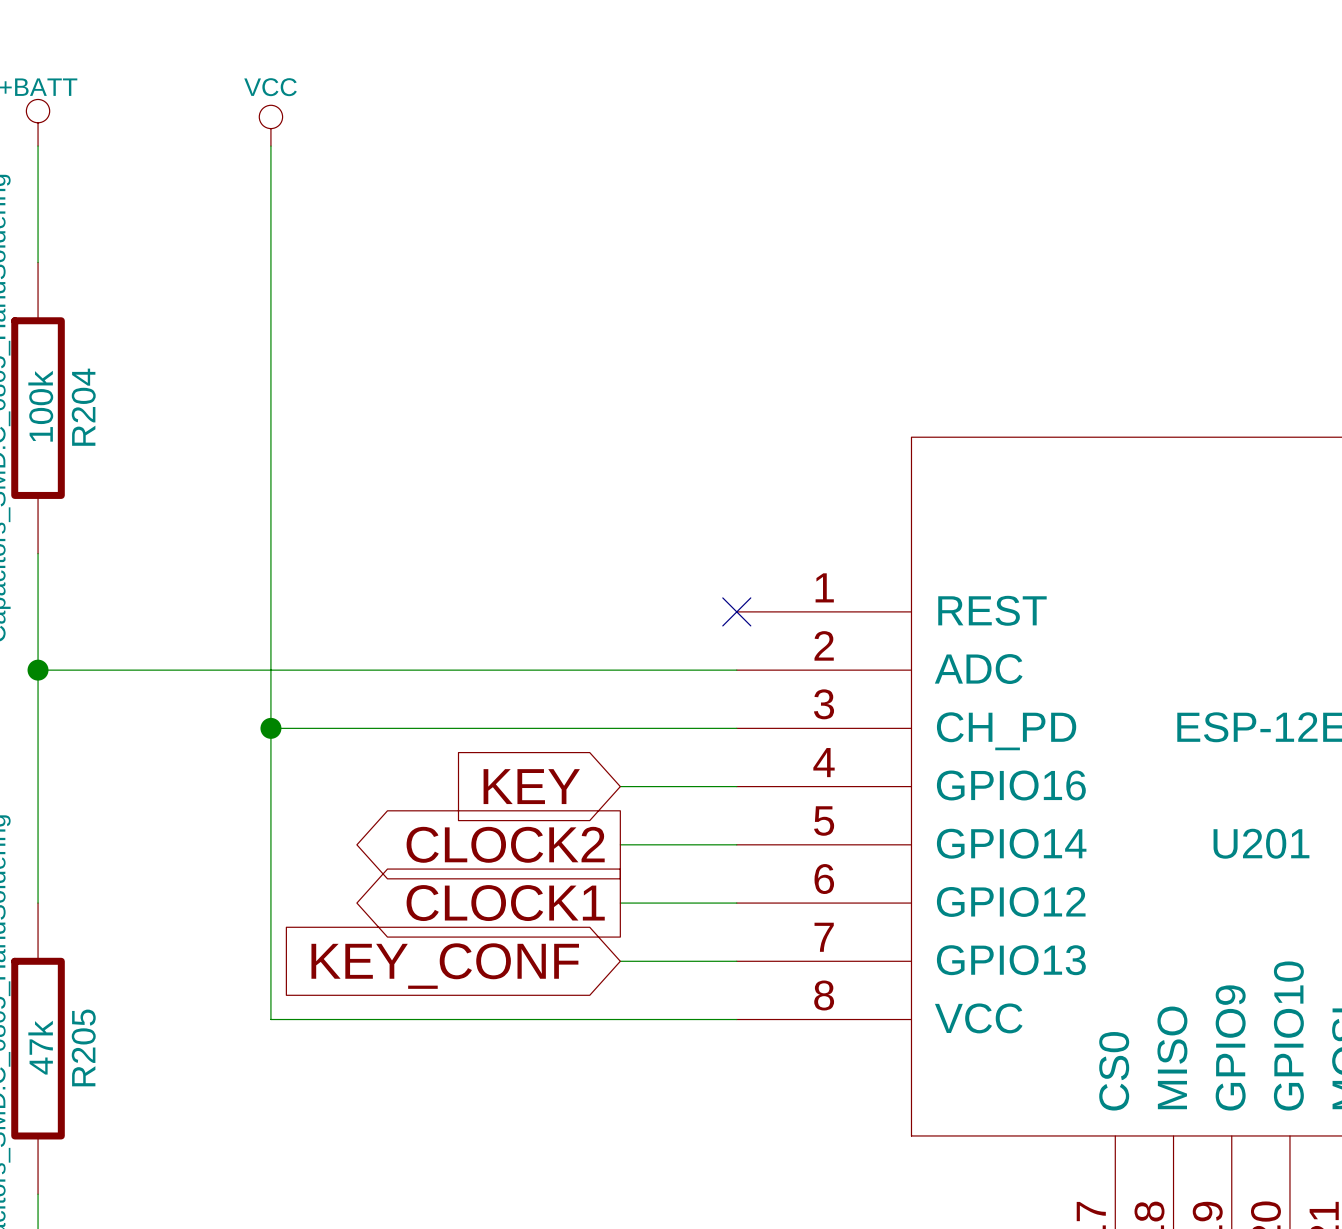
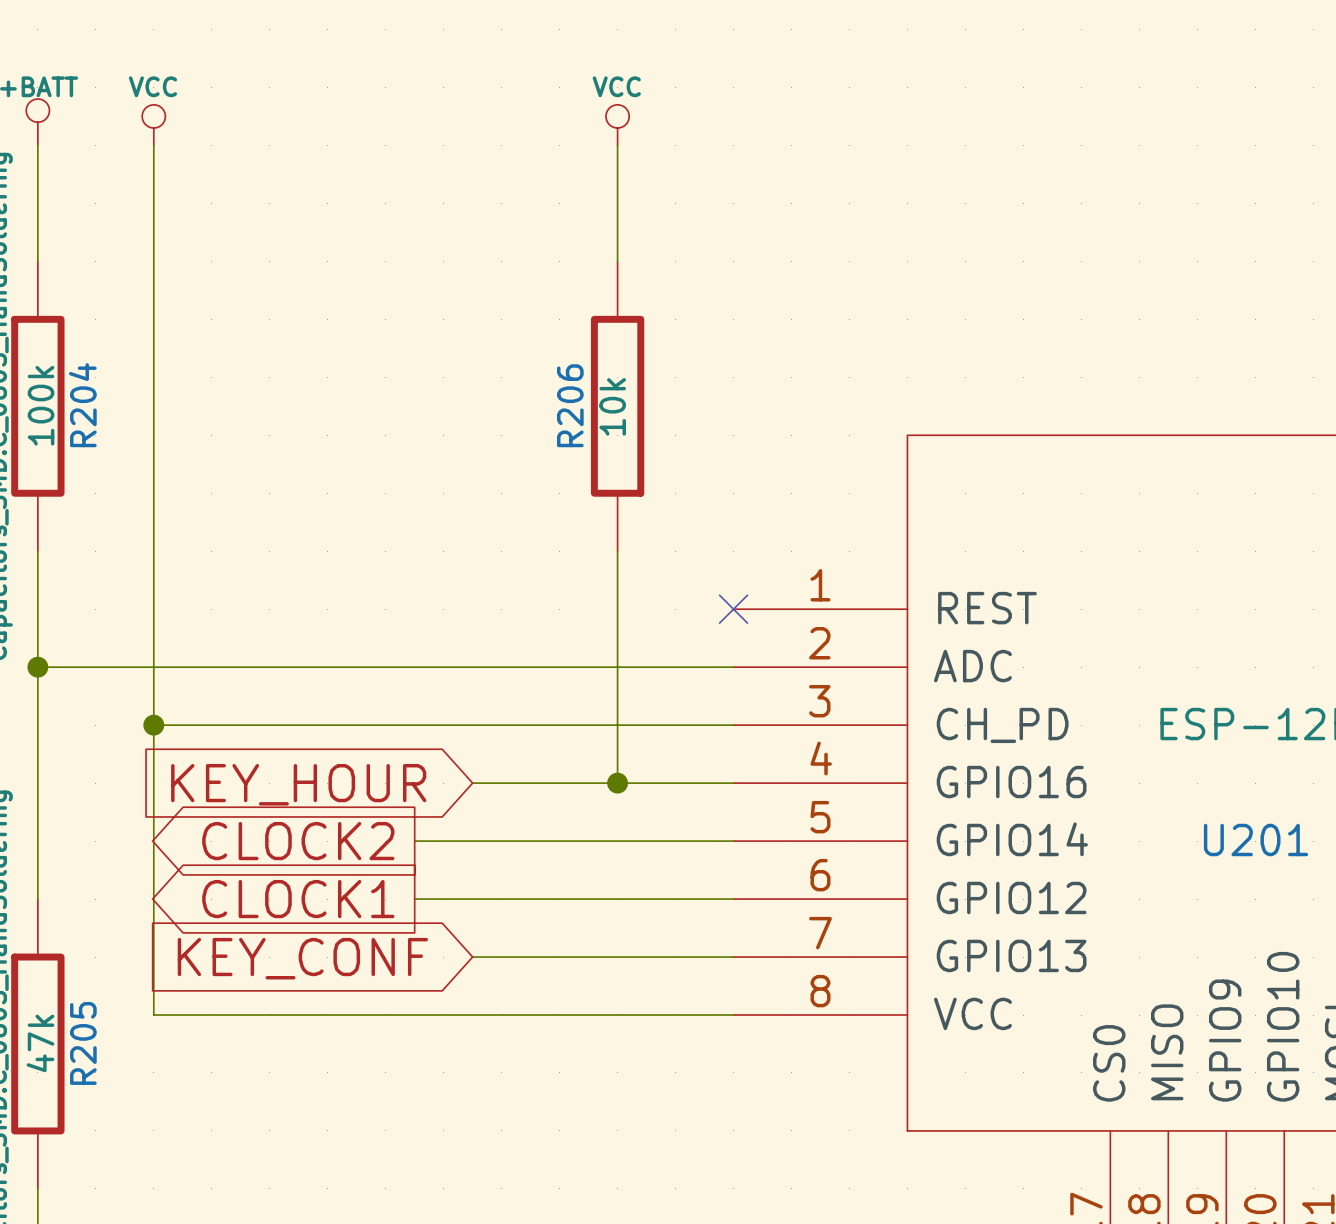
power symbol position: VCC (270, 125) -> VCC (153, 125)
power symbol: none -> VCC (617, 125)
wire: (270, 146) (270, 1019) -> (153, 145) (153, 1015) (269, 1015)
wire: none -> (617, 145) (617, 261)
R206: none -> 10k (617, 406)
wire: none -> (617, 551) (617, 783) (472, 783)
wire: none -> (153, 725) (269, 725)
junction position: (270, 728) -> (153, 725)
global label: KEY (531, 786) -> none
junction: none -> (617, 783)
global label: none -> KEY_HOUR (298, 784)
wire: none -> (414, 841) (617, 841)
global label position: CLOCK2 (505, 844) -> CLOCK2 (298, 841)
wire: none -> (414, 899) (617, 899)
global label position: CLOCK1 (505, 903) -> CLOCK1 (298, 899)
wire: none -> (472, 957) (617, 957)
global label position: KEY_CONF (445, 966) -> KEY_CONF (302, 958)

